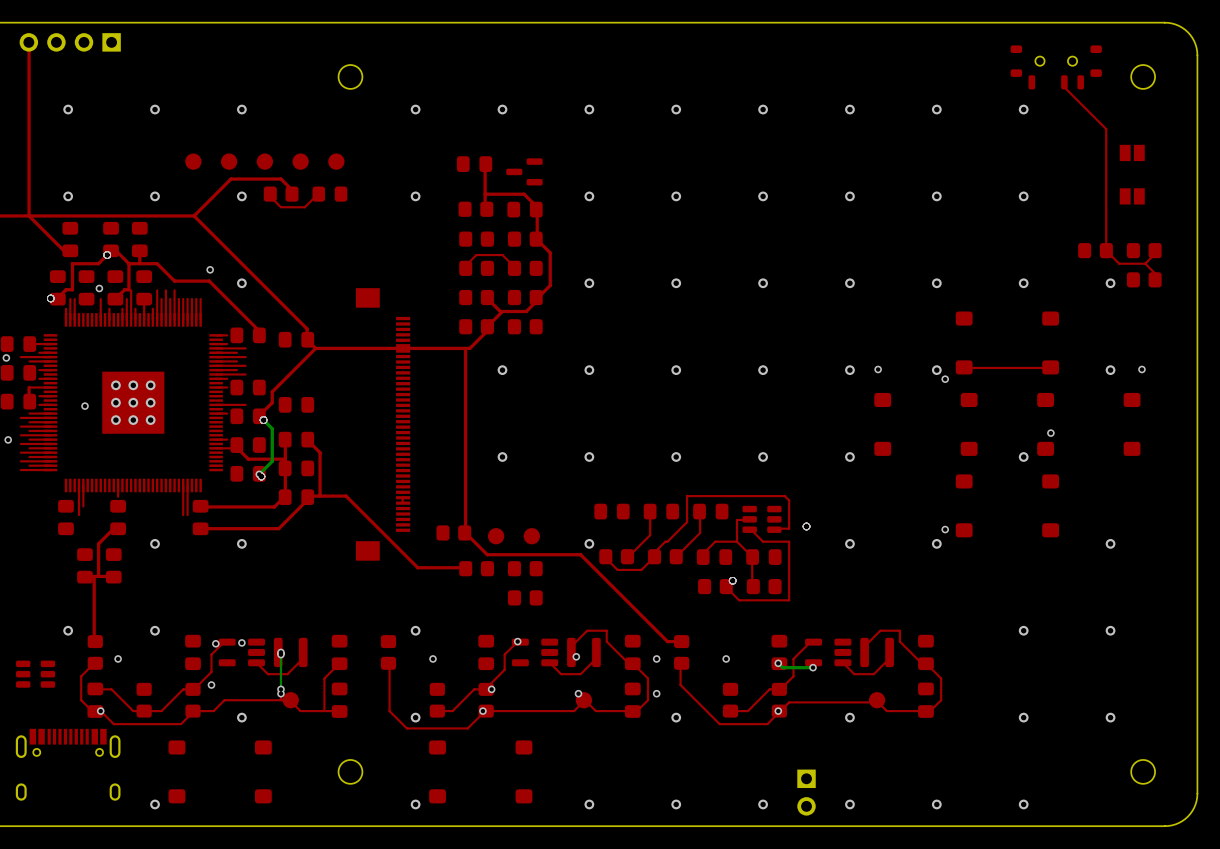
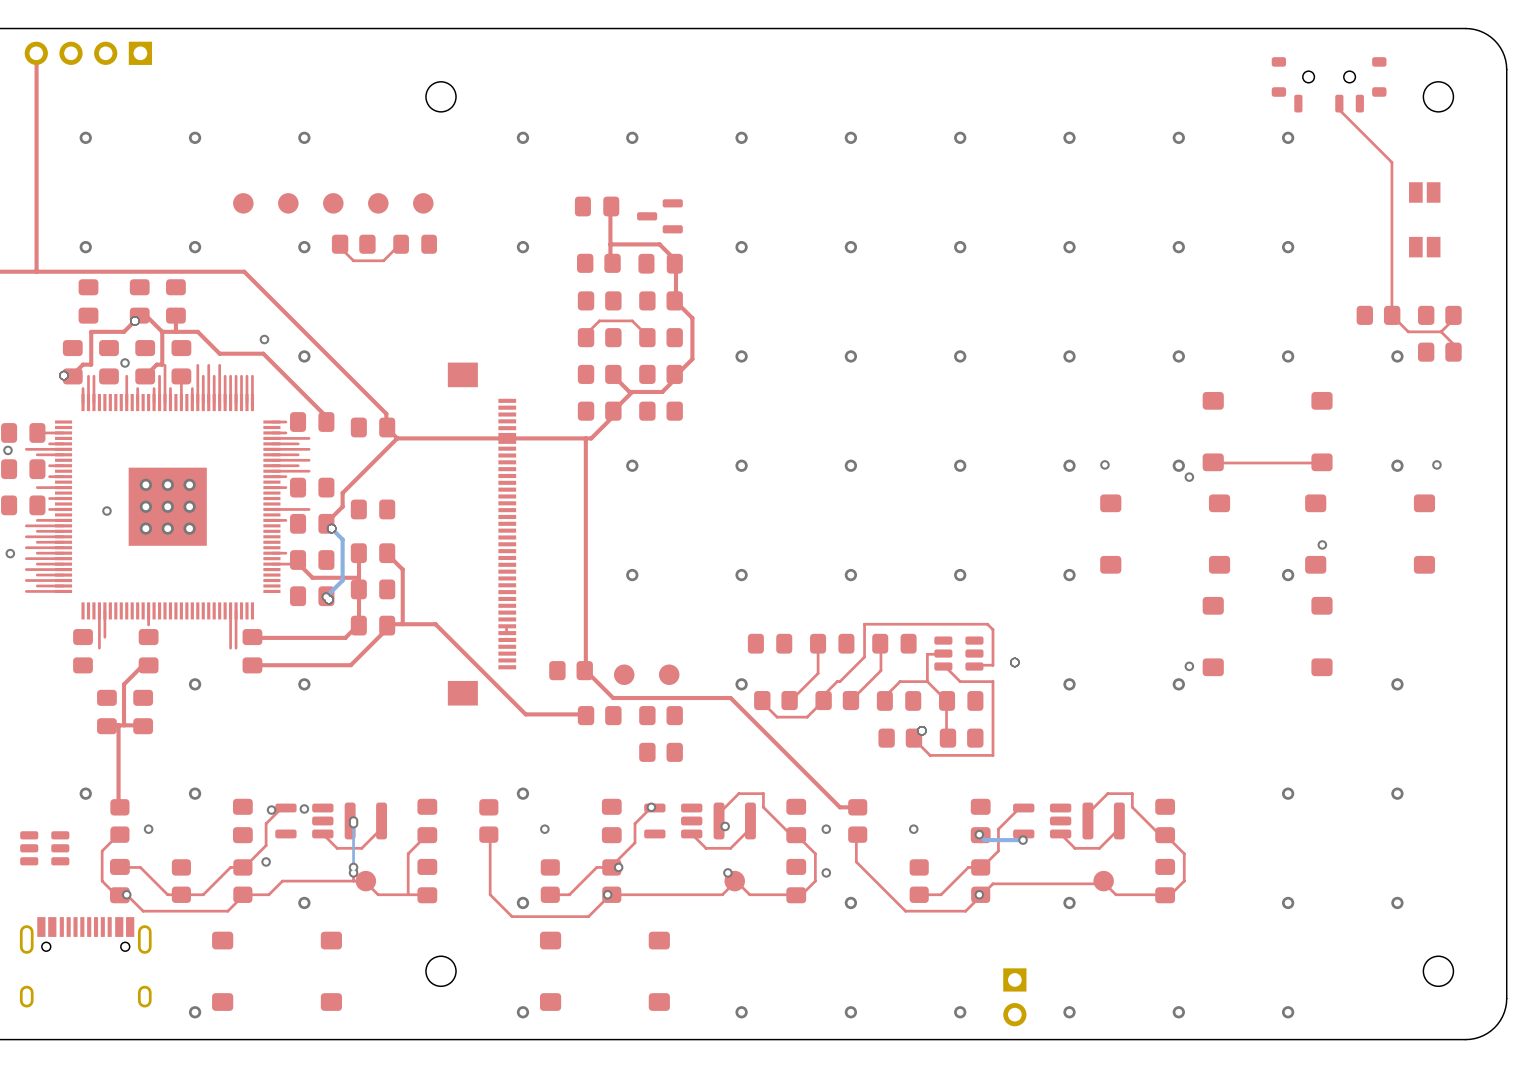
top track: (291, 194) (291, 189) (280, 179) (231, 179) (194, 215) -> none
top track: (29, 215) (63, 250) (70, 250) -> none
top track: (29, 387) (29, 402) -> none

